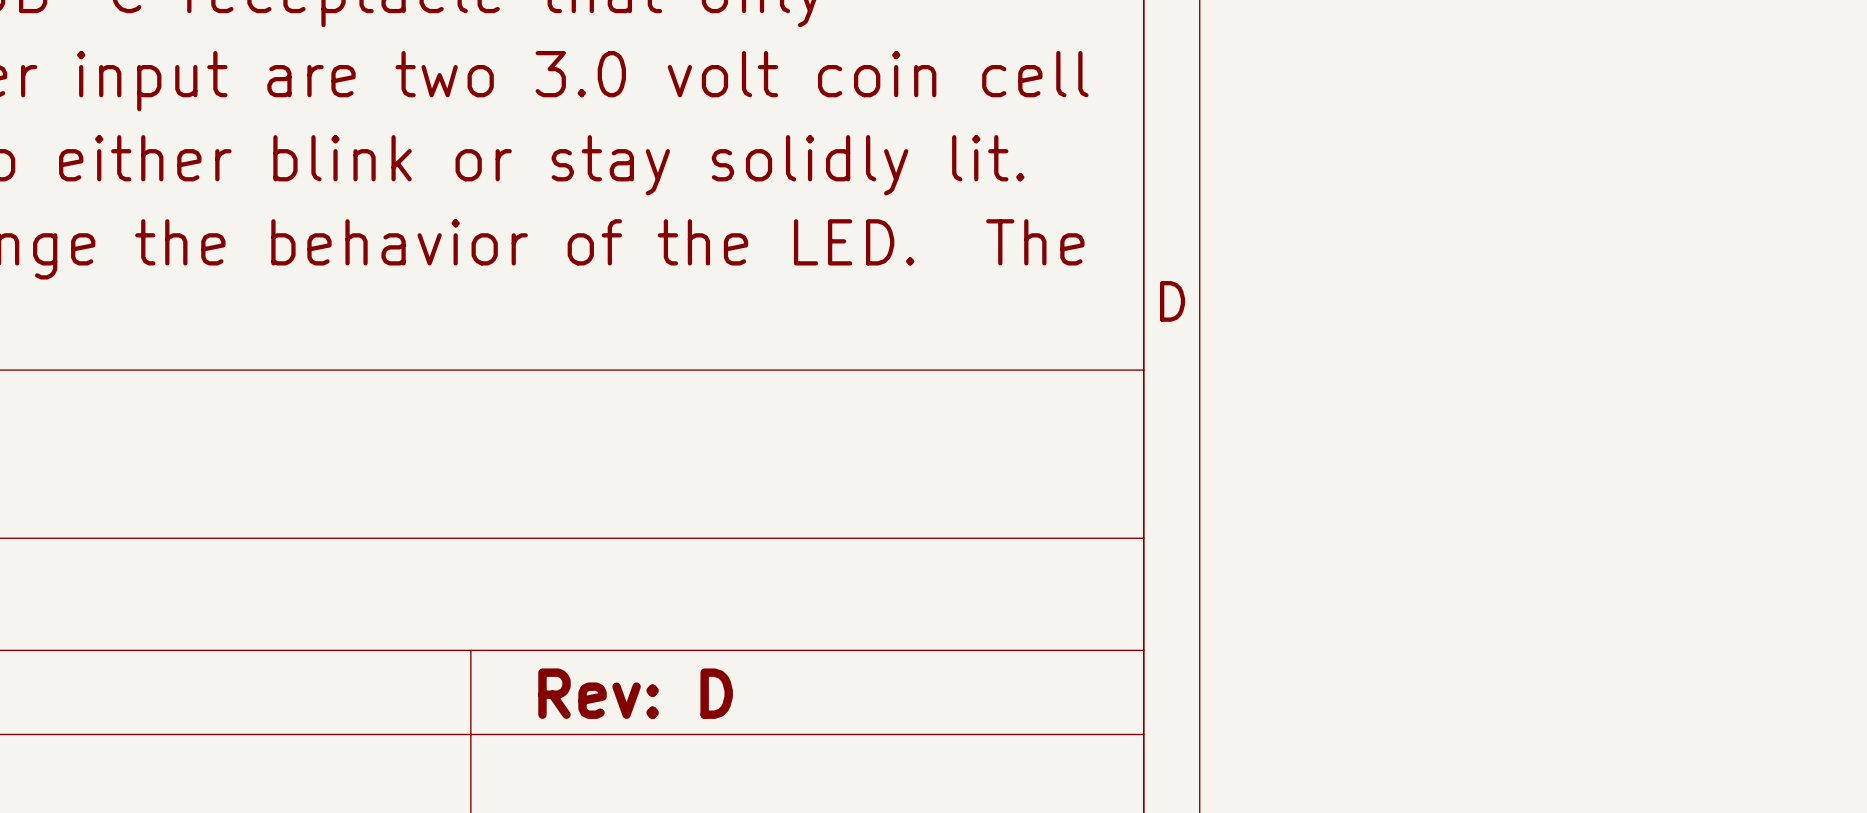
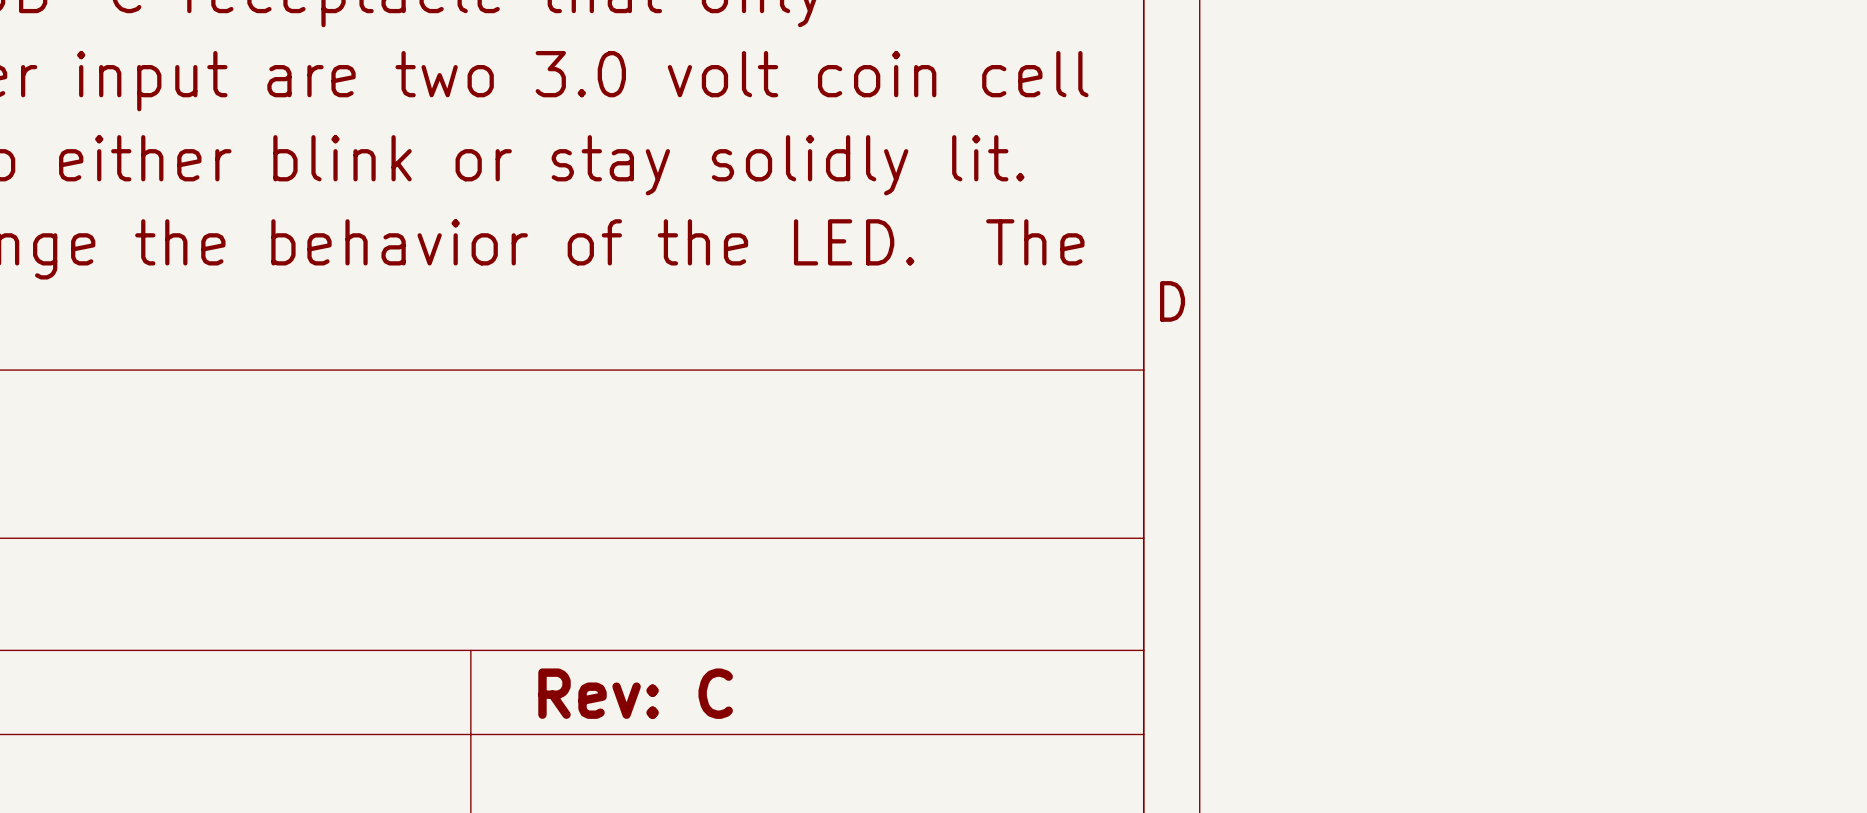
title block: Rev: D (635, 693) -> Rev: C (635, 693)

